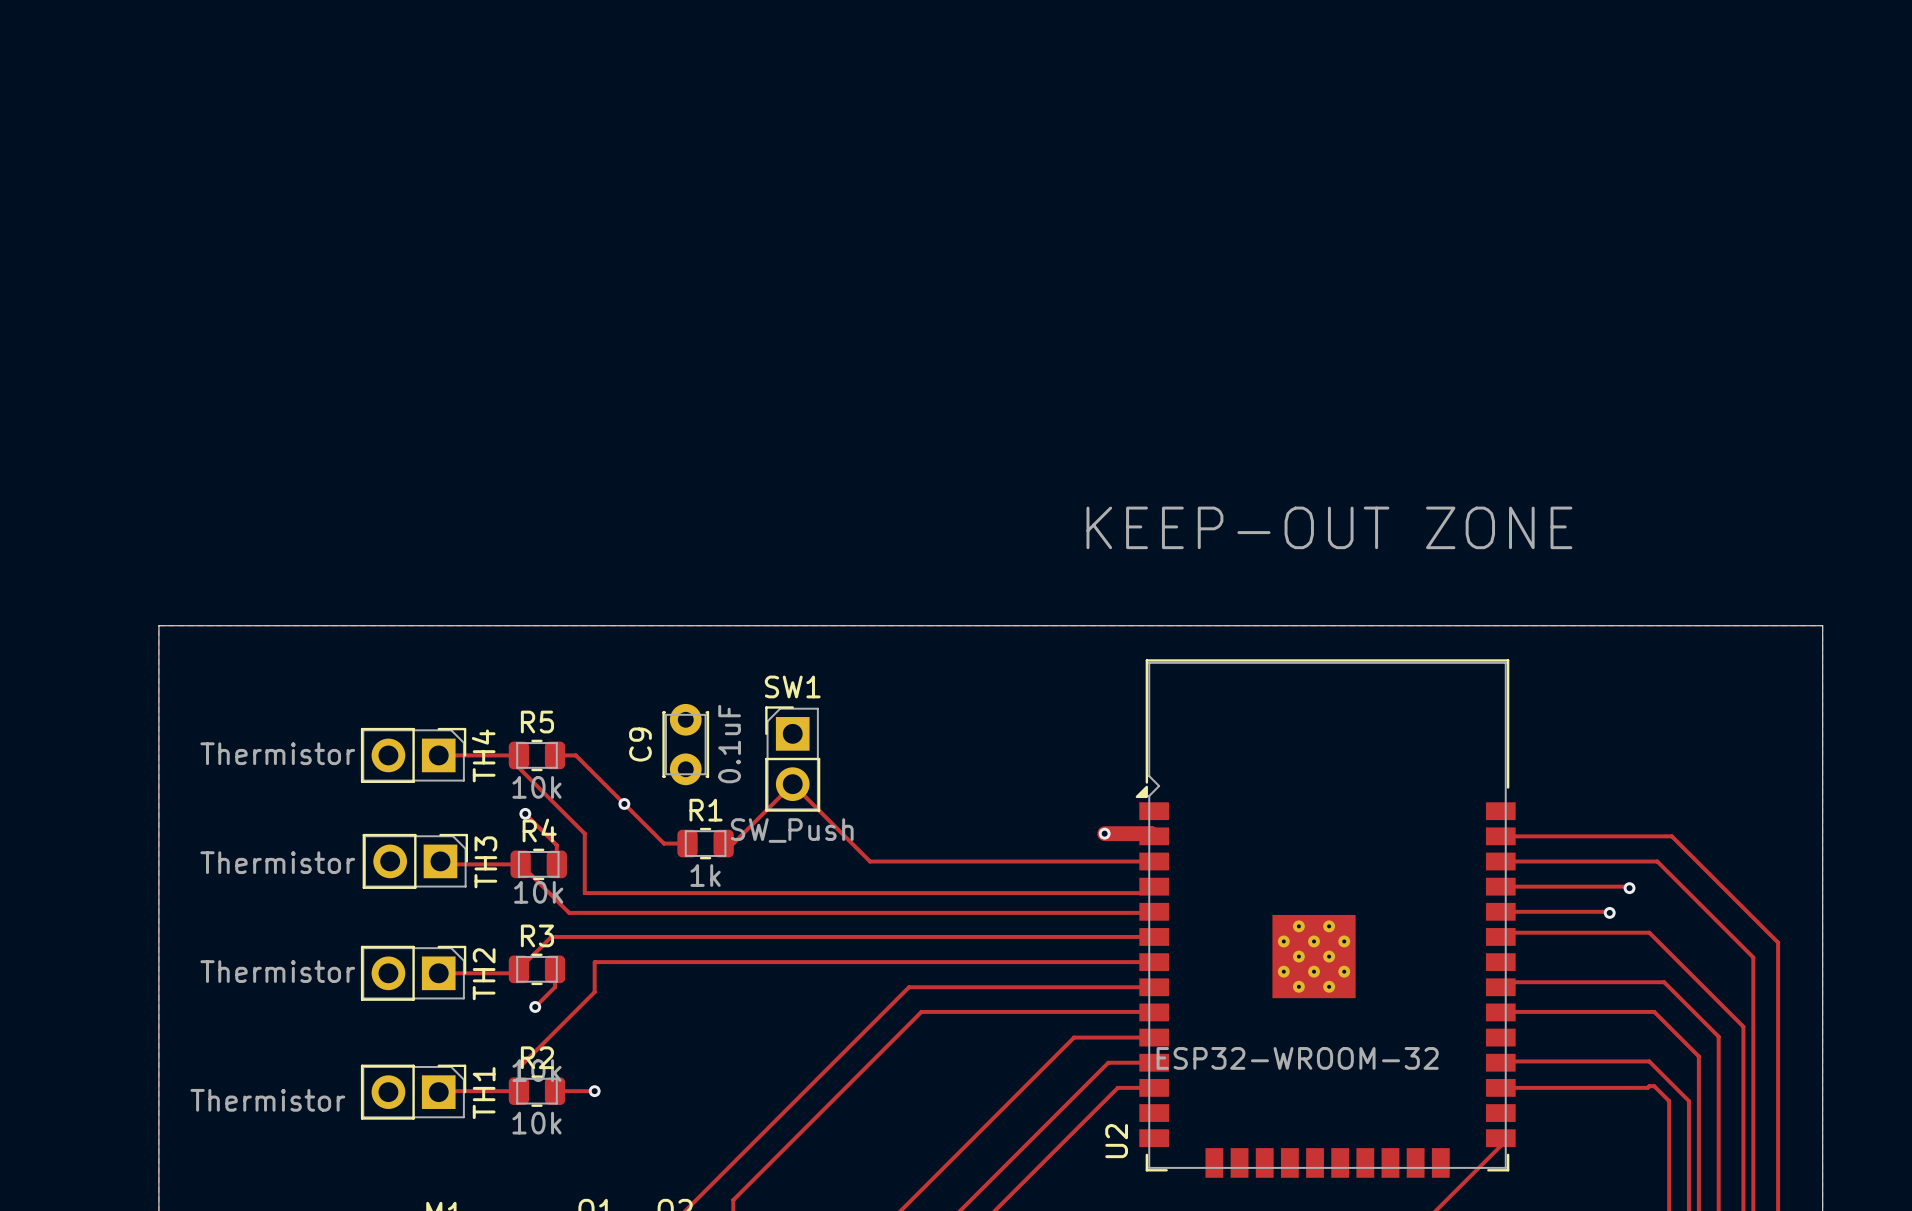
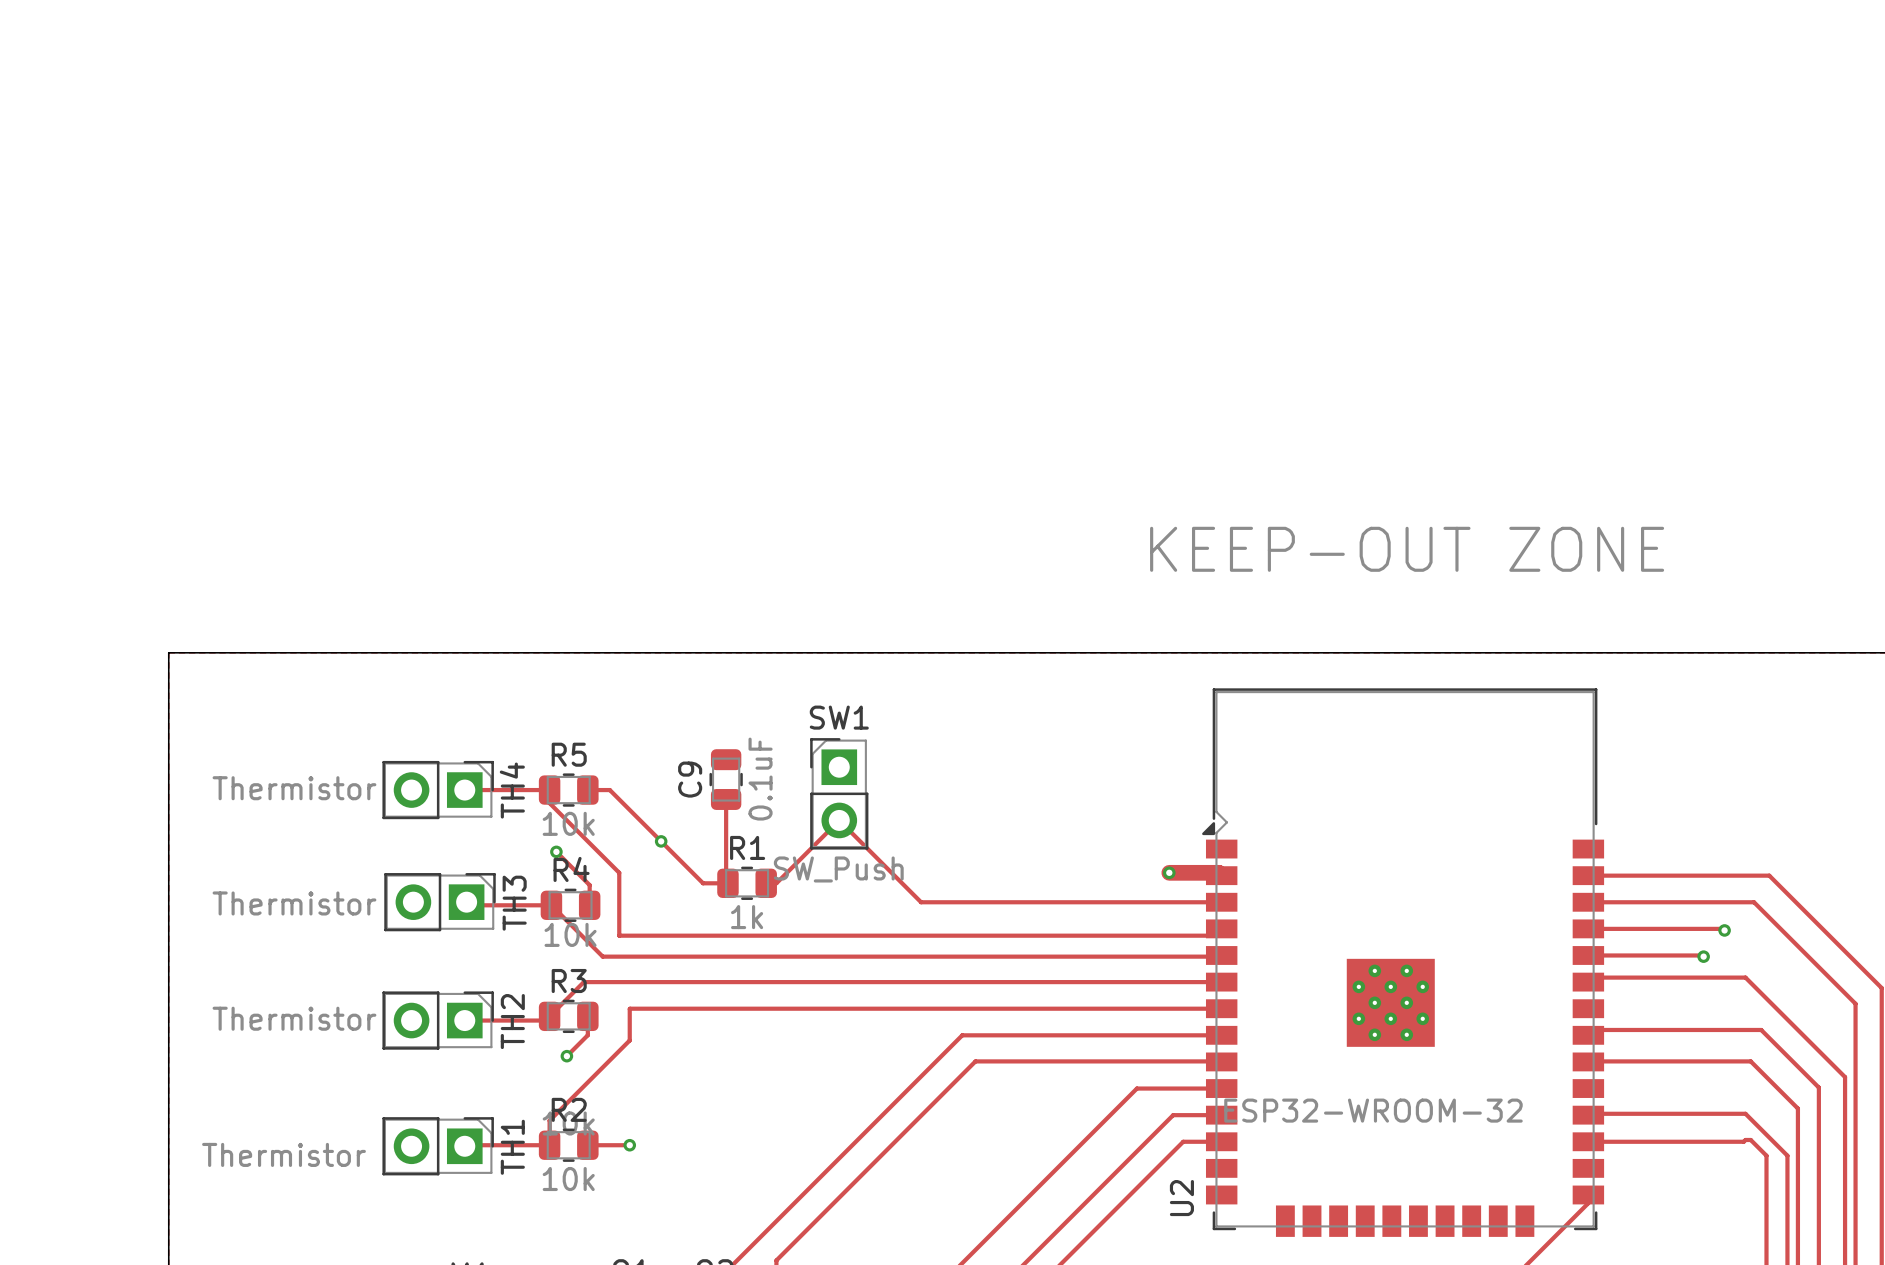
C9 footprint: [662, 703, 710, 786] -> [709, 749, 743, 810]
track: none -> (726, 799) (726, 881) (727, 883)

